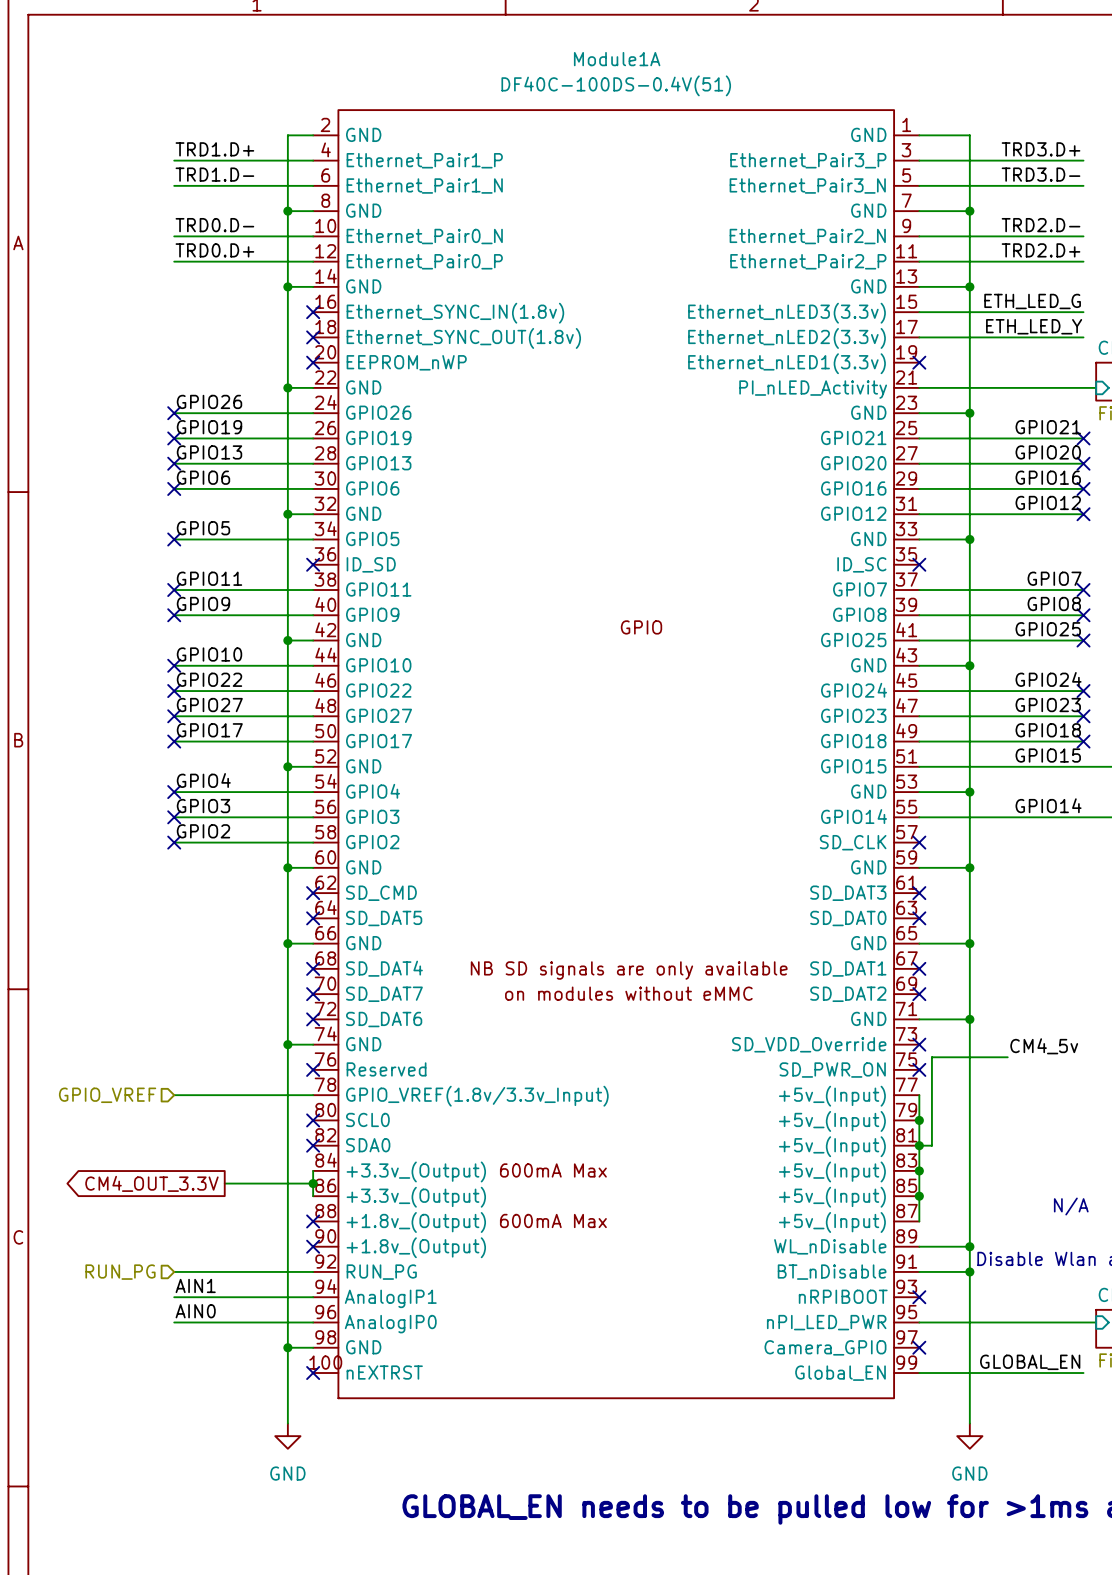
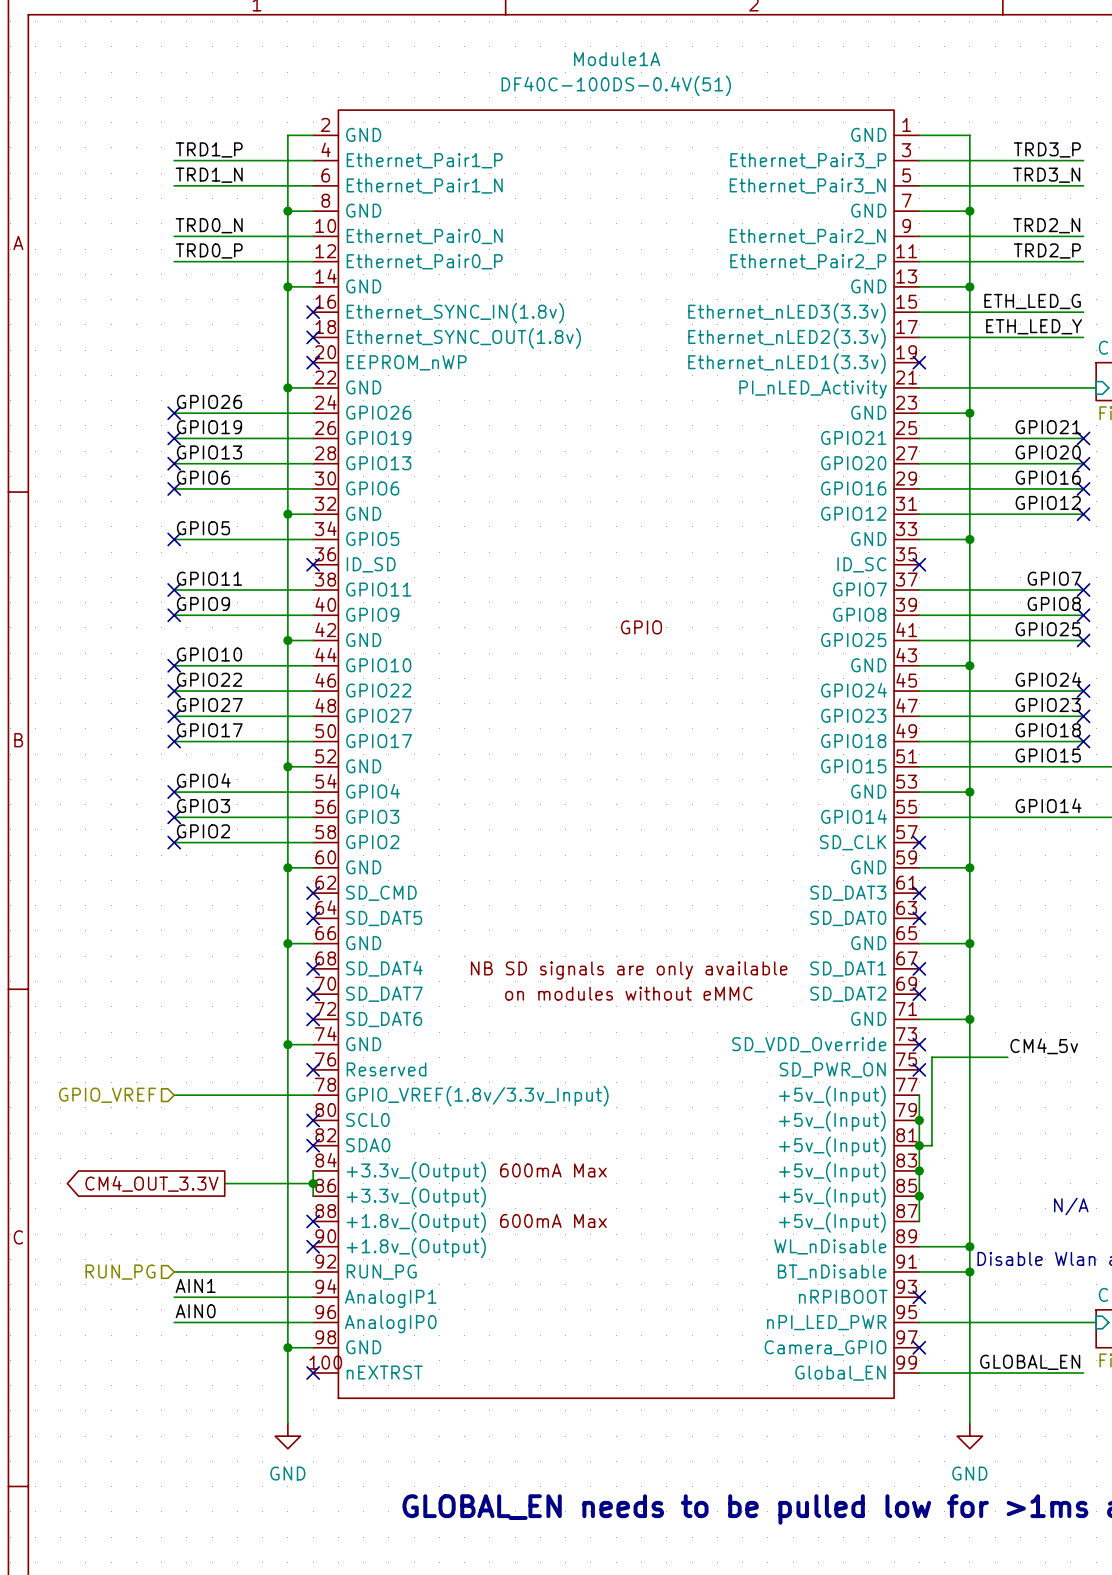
label: TRD1.D+ (214, 149) -> TRD1_P (209, 149)
label: TRD3.D+ (1041, 149) -> TRD3_P (1047, 149)
label: TRD1.D- (214, 174) -> TRD1_N (209, 175)
label: TRD3.D- (1041, 174) -> TRD3_N (1046, 175)
label: TRD0.D- (214, 225) -> TRD0_N (209, 225)
label: TRD2.D- (1041, 225) -> TRD2_N (1046, 225)
label: TRD0.D+ (214, 250) -> TRD0_P (209, 250)
label: TRD2.D+ (1041, 250) -> TRD2_P (1047, 250)

